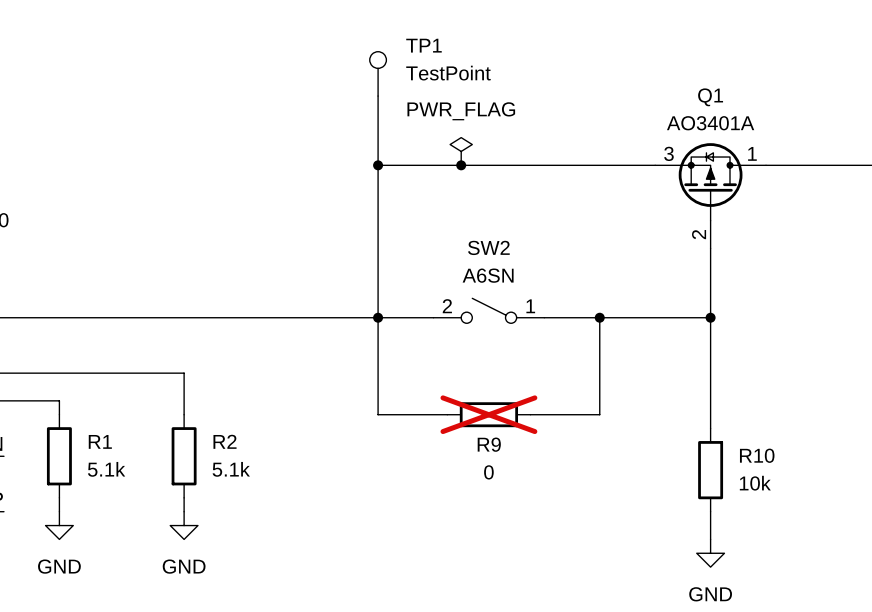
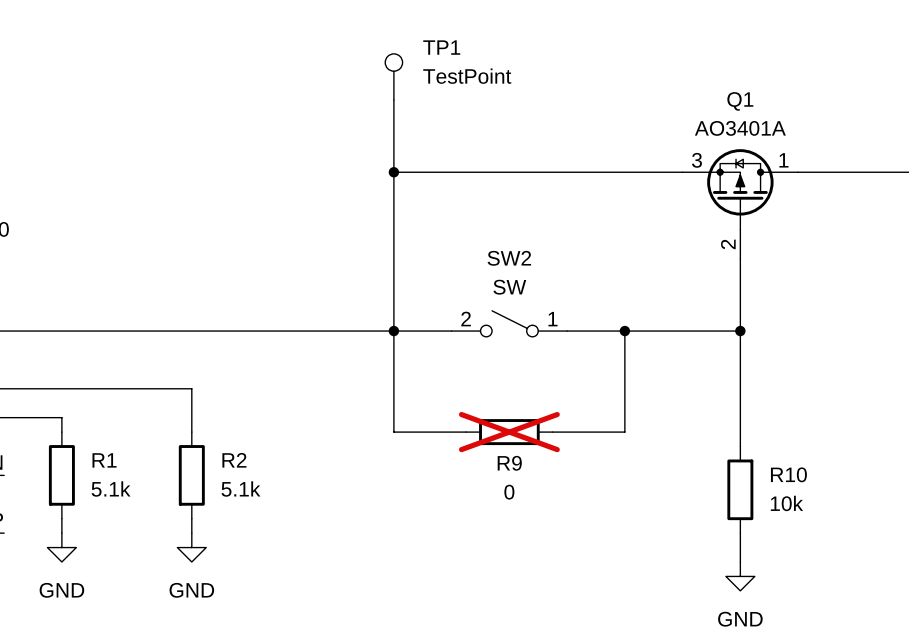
power symbol: PWR_FLAG (461, 151) -> none
junction: (461, 165) -> none
SW2 value: A6SN (488, 275) -> SW (509, 287)

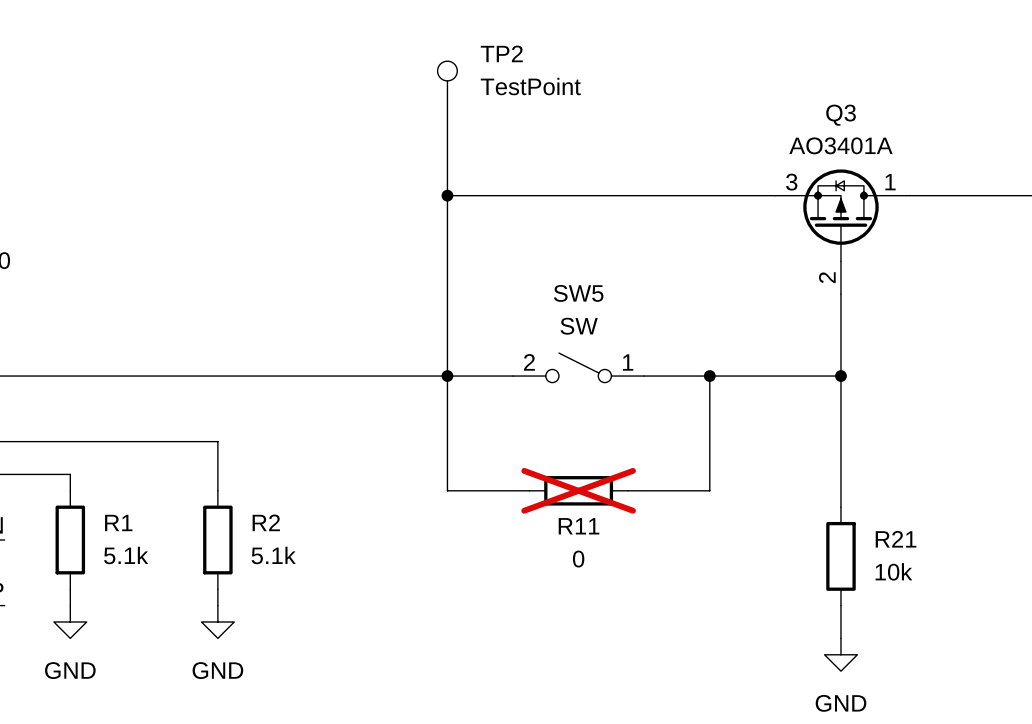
TP1 name: TP1 (441, 47) -> TP2 (501, 53)
Q1 name: Q1 (740, 101) -> Q3 (841, 115)
SW2 name: SW2 (509, 258) -> SW5 (578, 293)
R9 name: R9 (509, 463) -> R11 (579, 526)
R10 name: R10 (788, 474) -> R21 (896, 539)

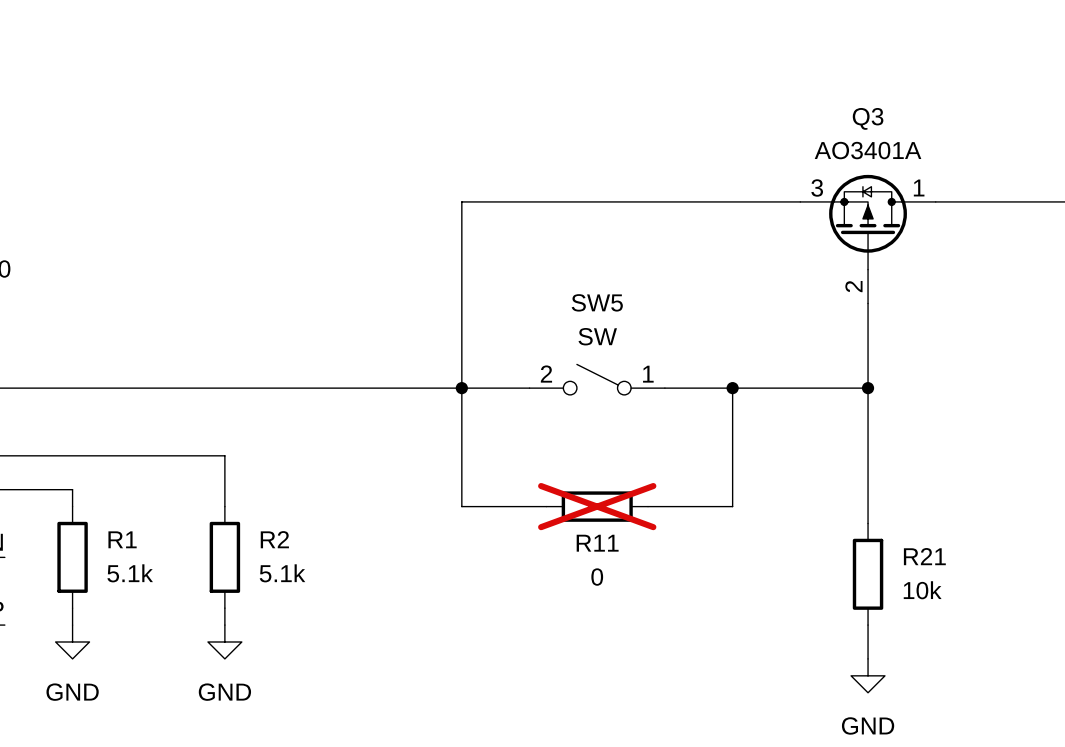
TP2: TestPoint (447, 87) -> none
wire: (447, 113) (447, 195) -> none
junction: (447, 195) -> none

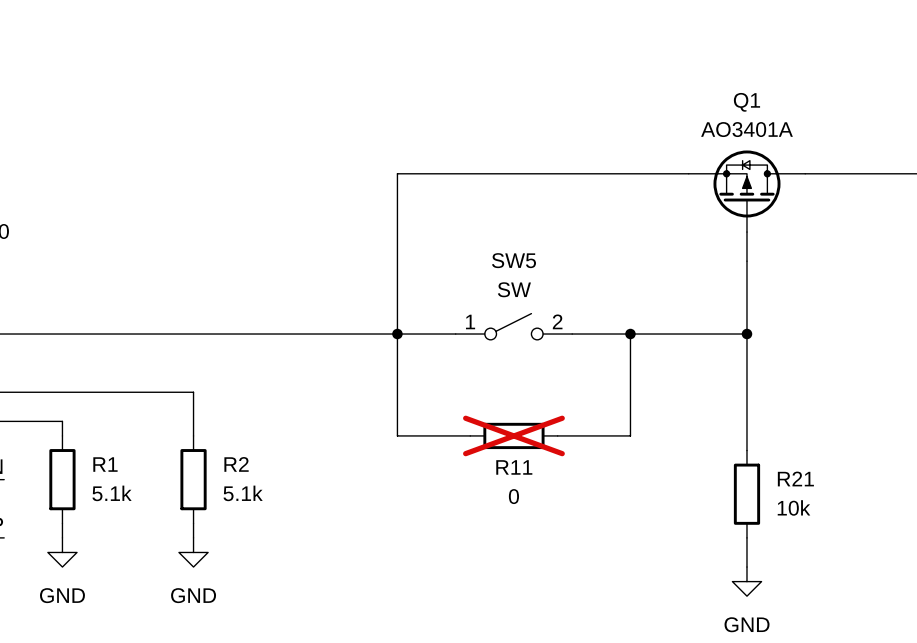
Q3 name: Q3 (868, 118) -> Q1 (746, 102)
Q3 pin number: 3 (817, 187) -> none
Q3 pin number: 1 (919, 187) -> none
Q3 pin number: 2 (853, 286) -> none
SW5 flip: as is (597, 379) -> left-right (513, 326)

